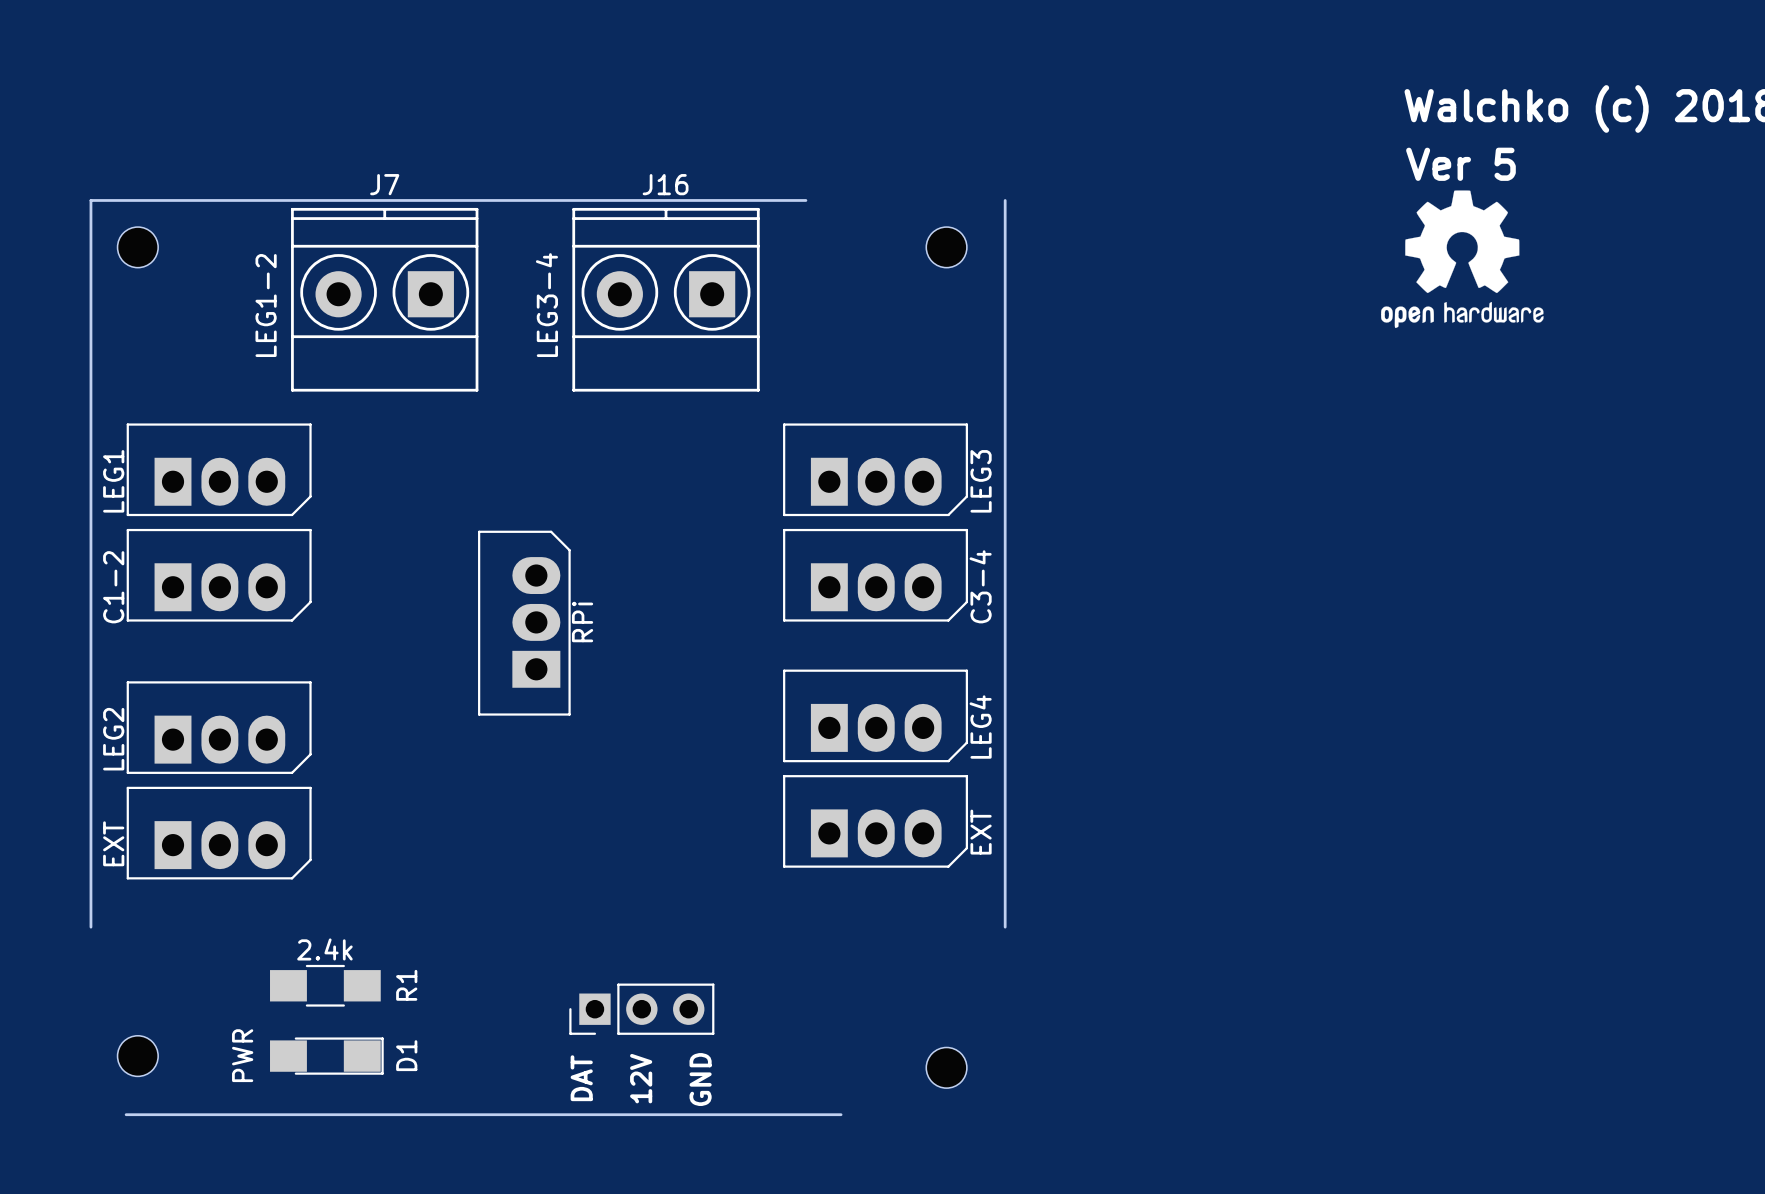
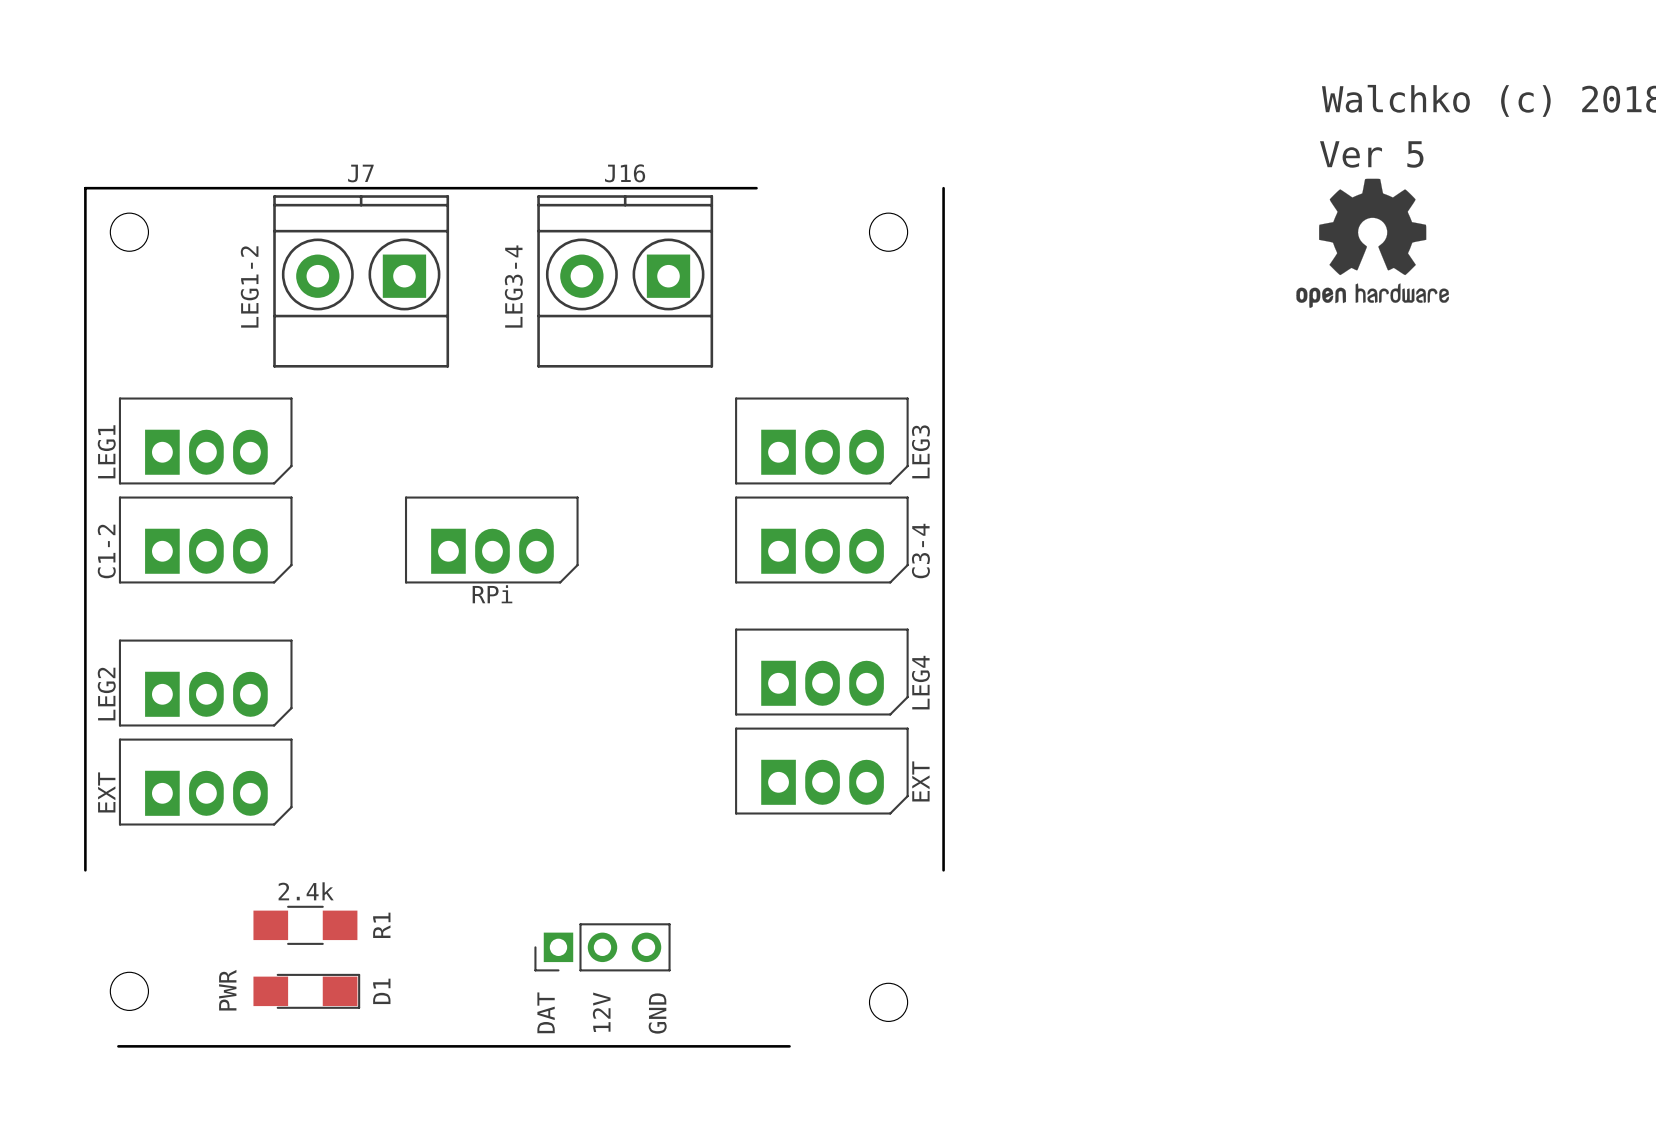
part rotation: 0° (524, 623) -> 90° clockwise (491, 540)

